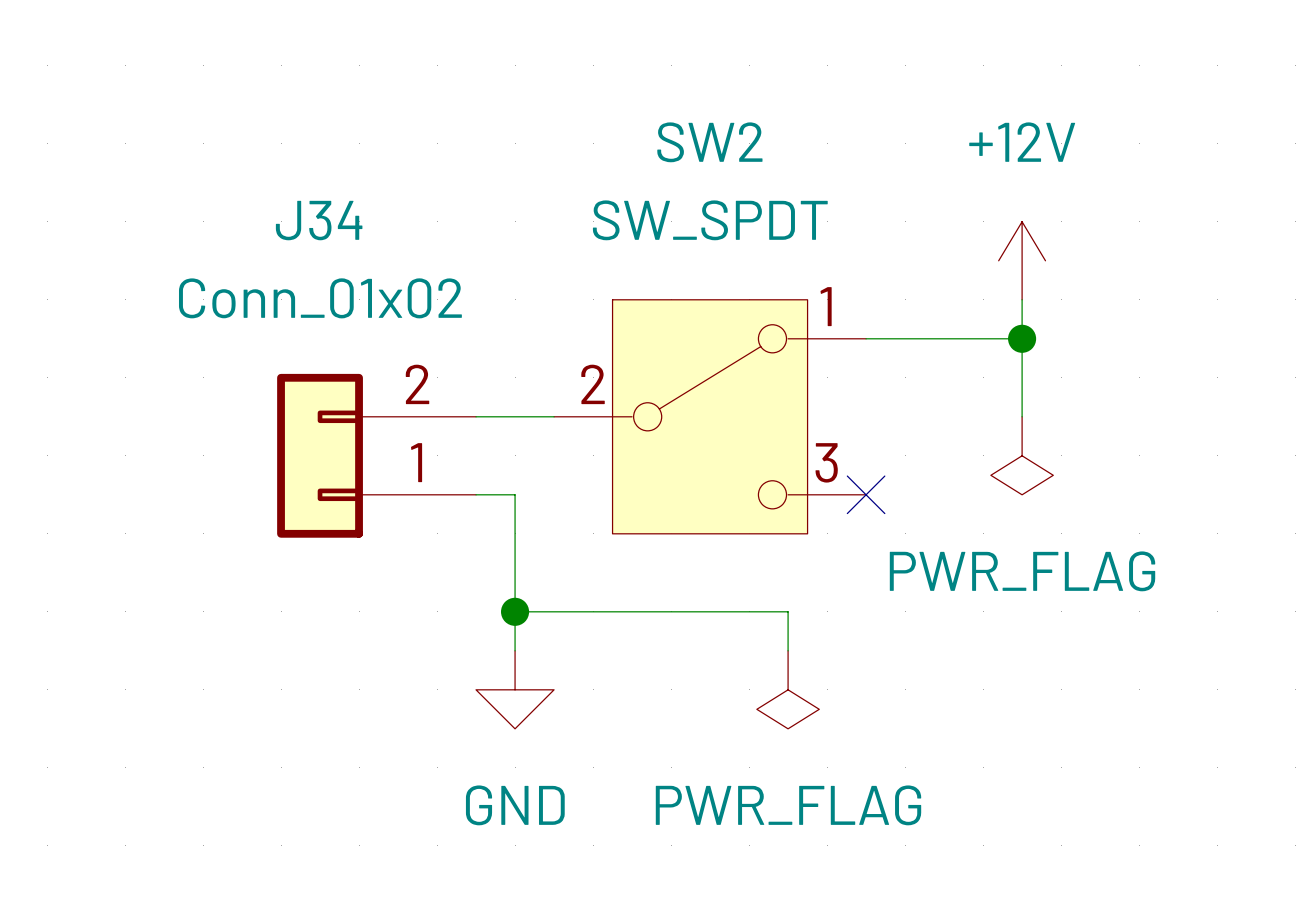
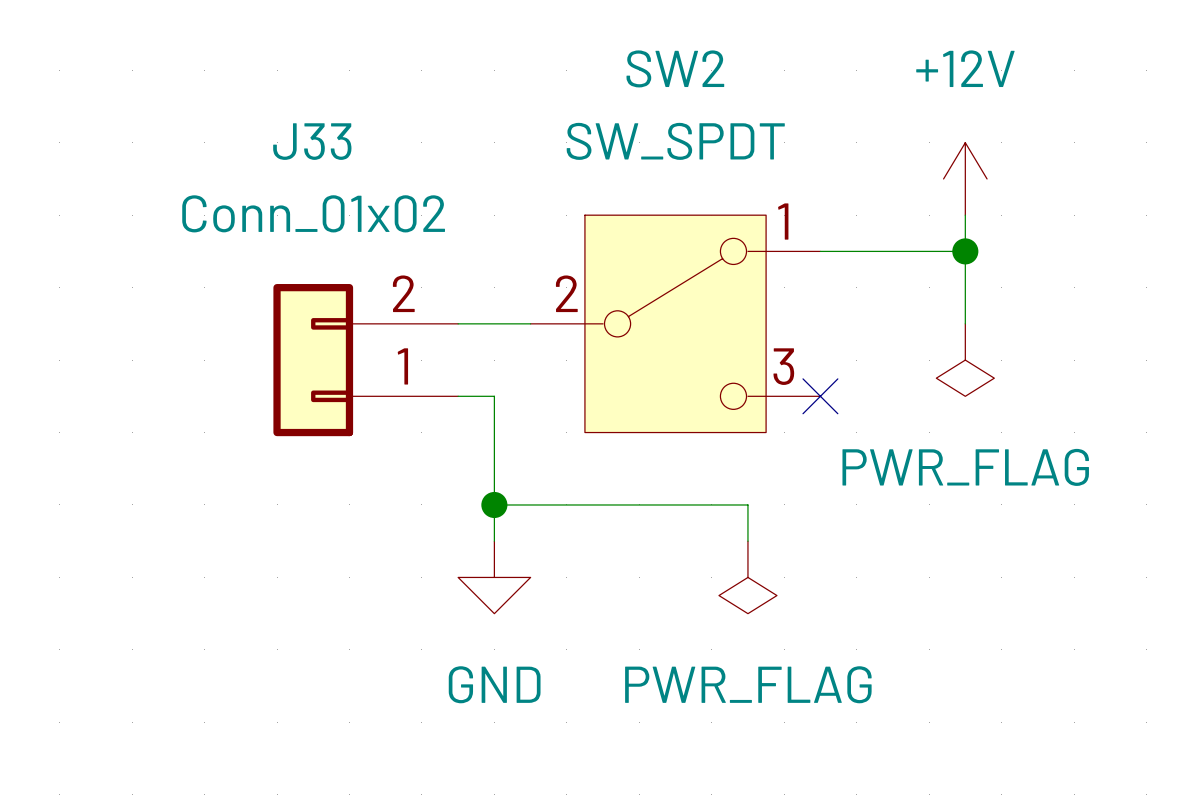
J34 name: J34 (319, 220) -> J33 (312, 141)

